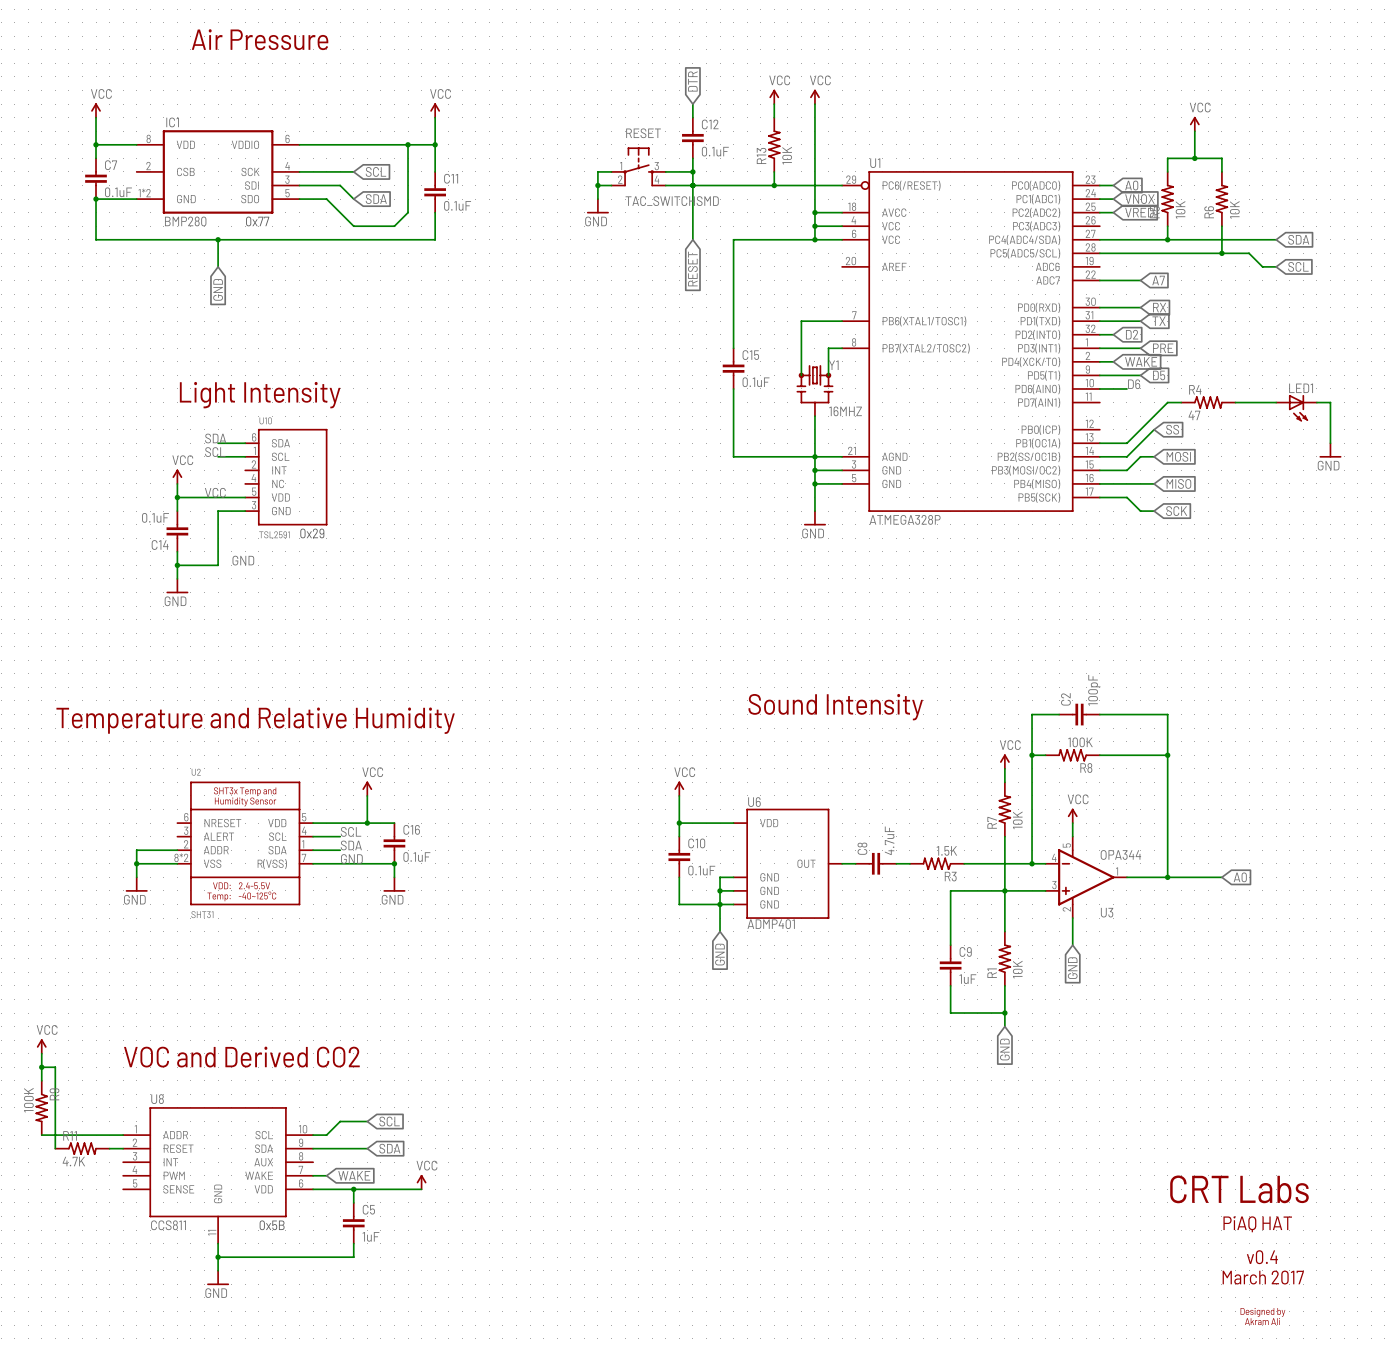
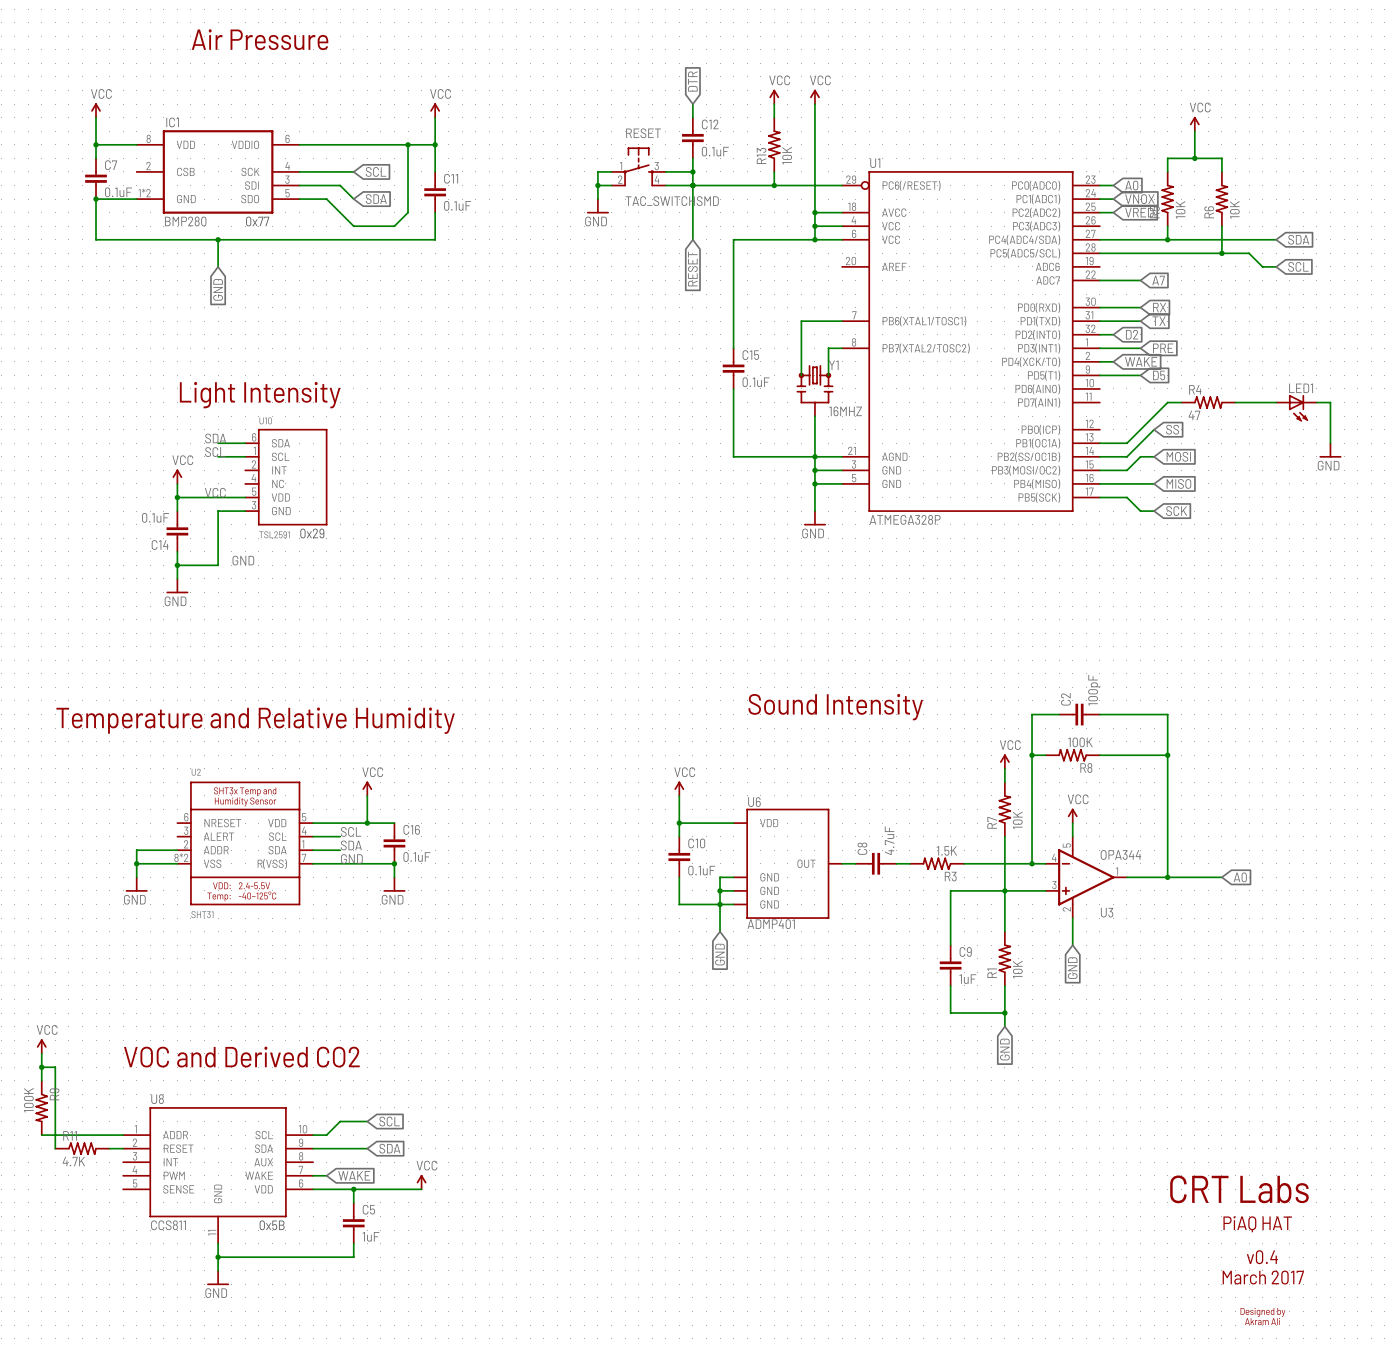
label: D6 (1134, 384) -> none
wire: (1099, 388) (1126, 388) -> none

